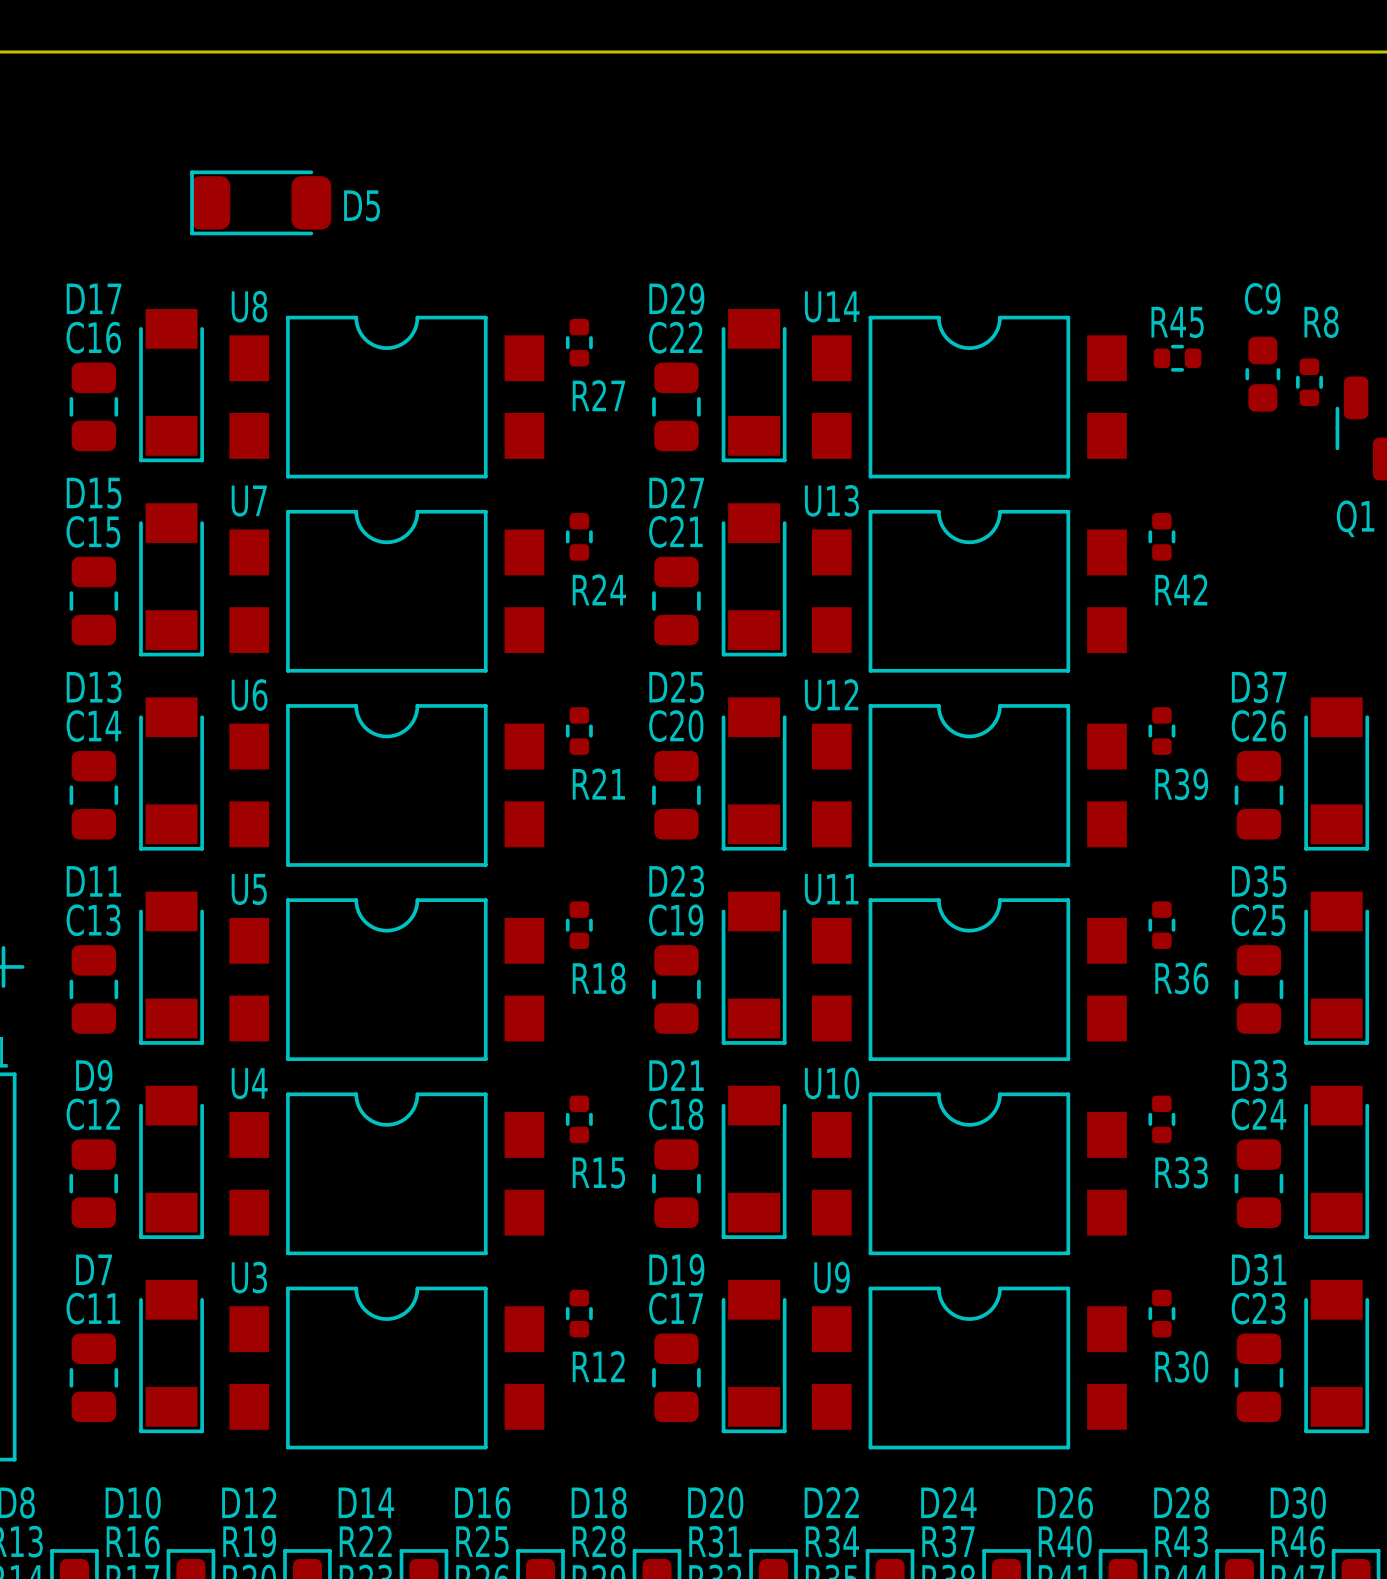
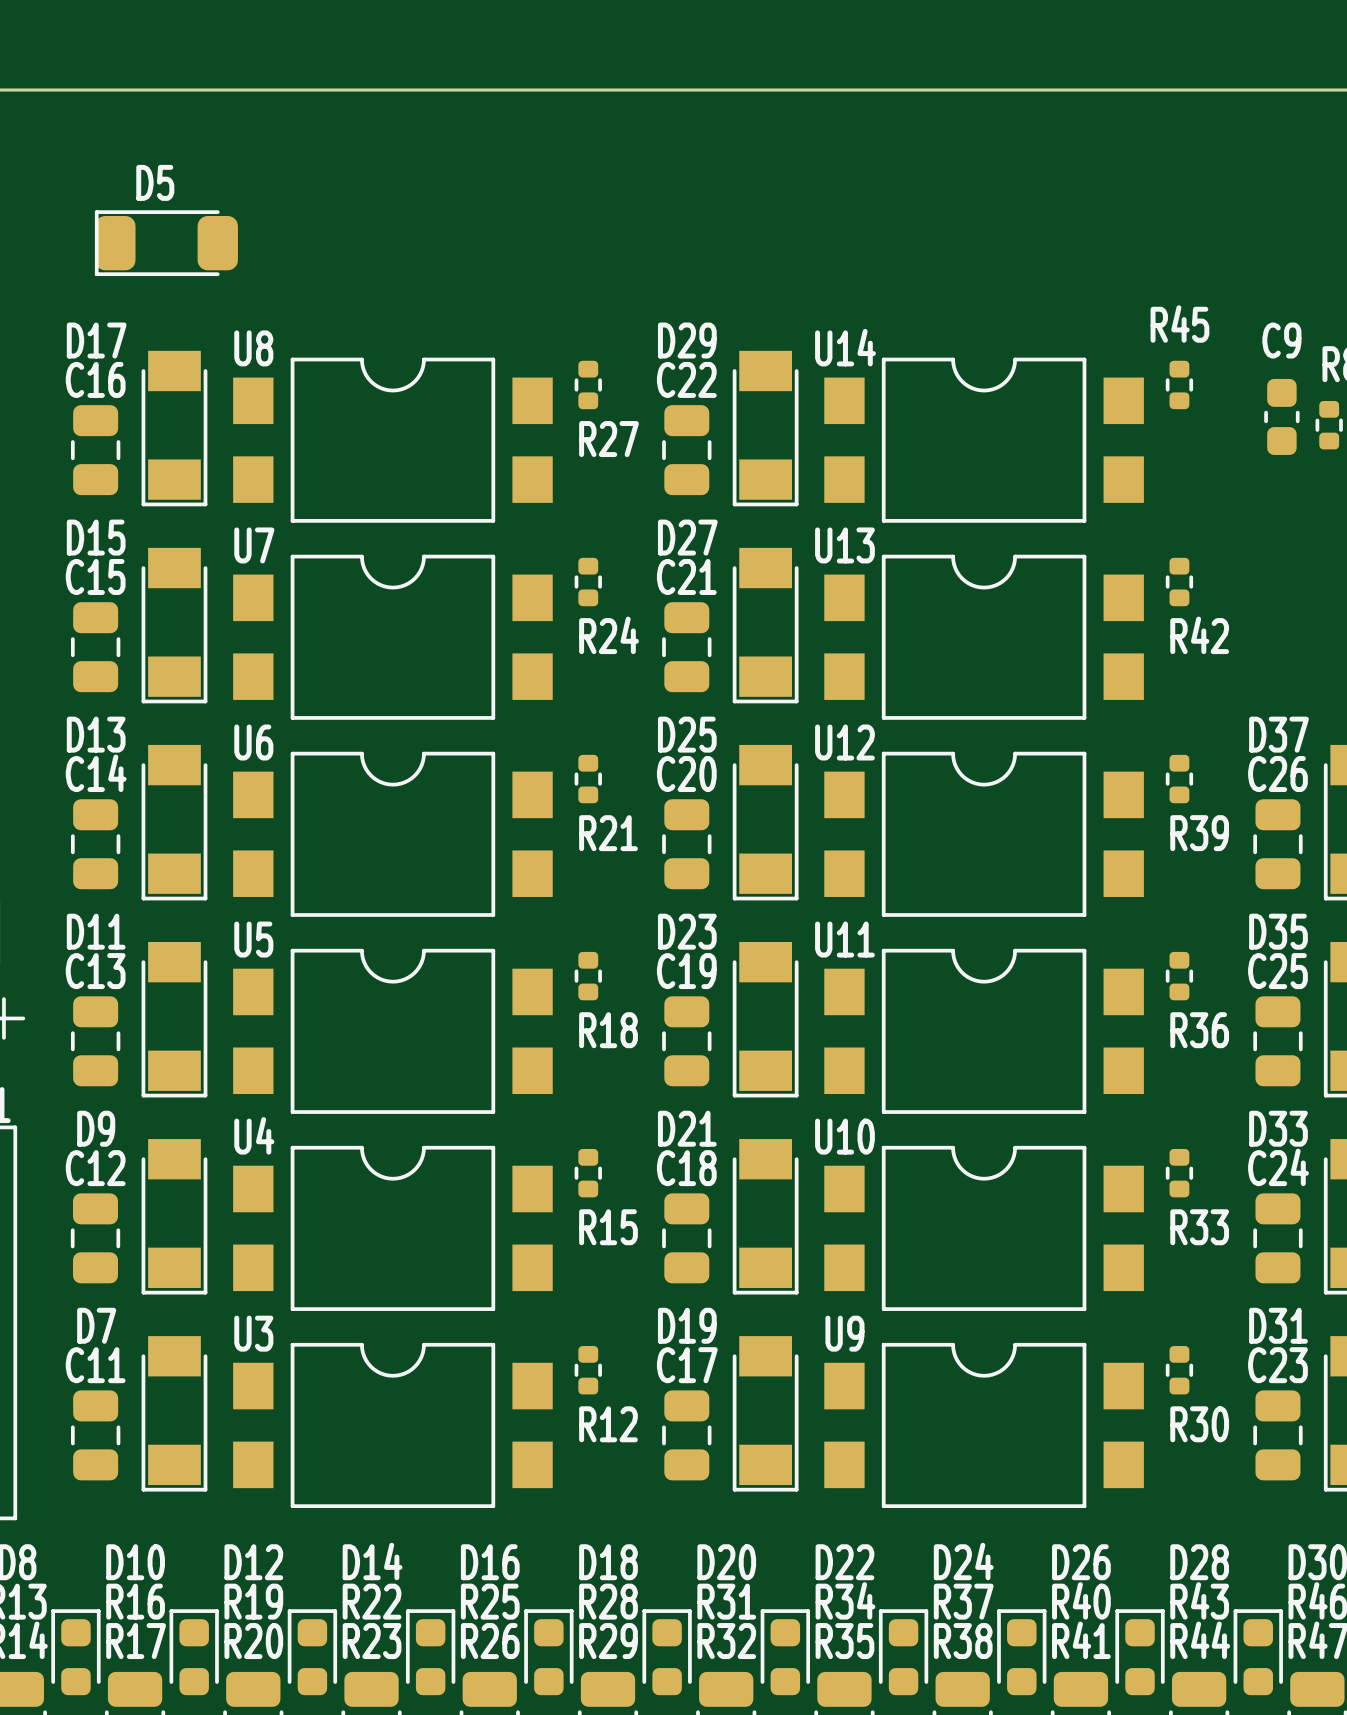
D5 position: (260, 202) -> (166, 243)
D5 name position: D5 (362, 205) -> D5 (155, 182)
R45 rotation: 0° (1177, 358) -> 90° clockwise (1179, 384)

